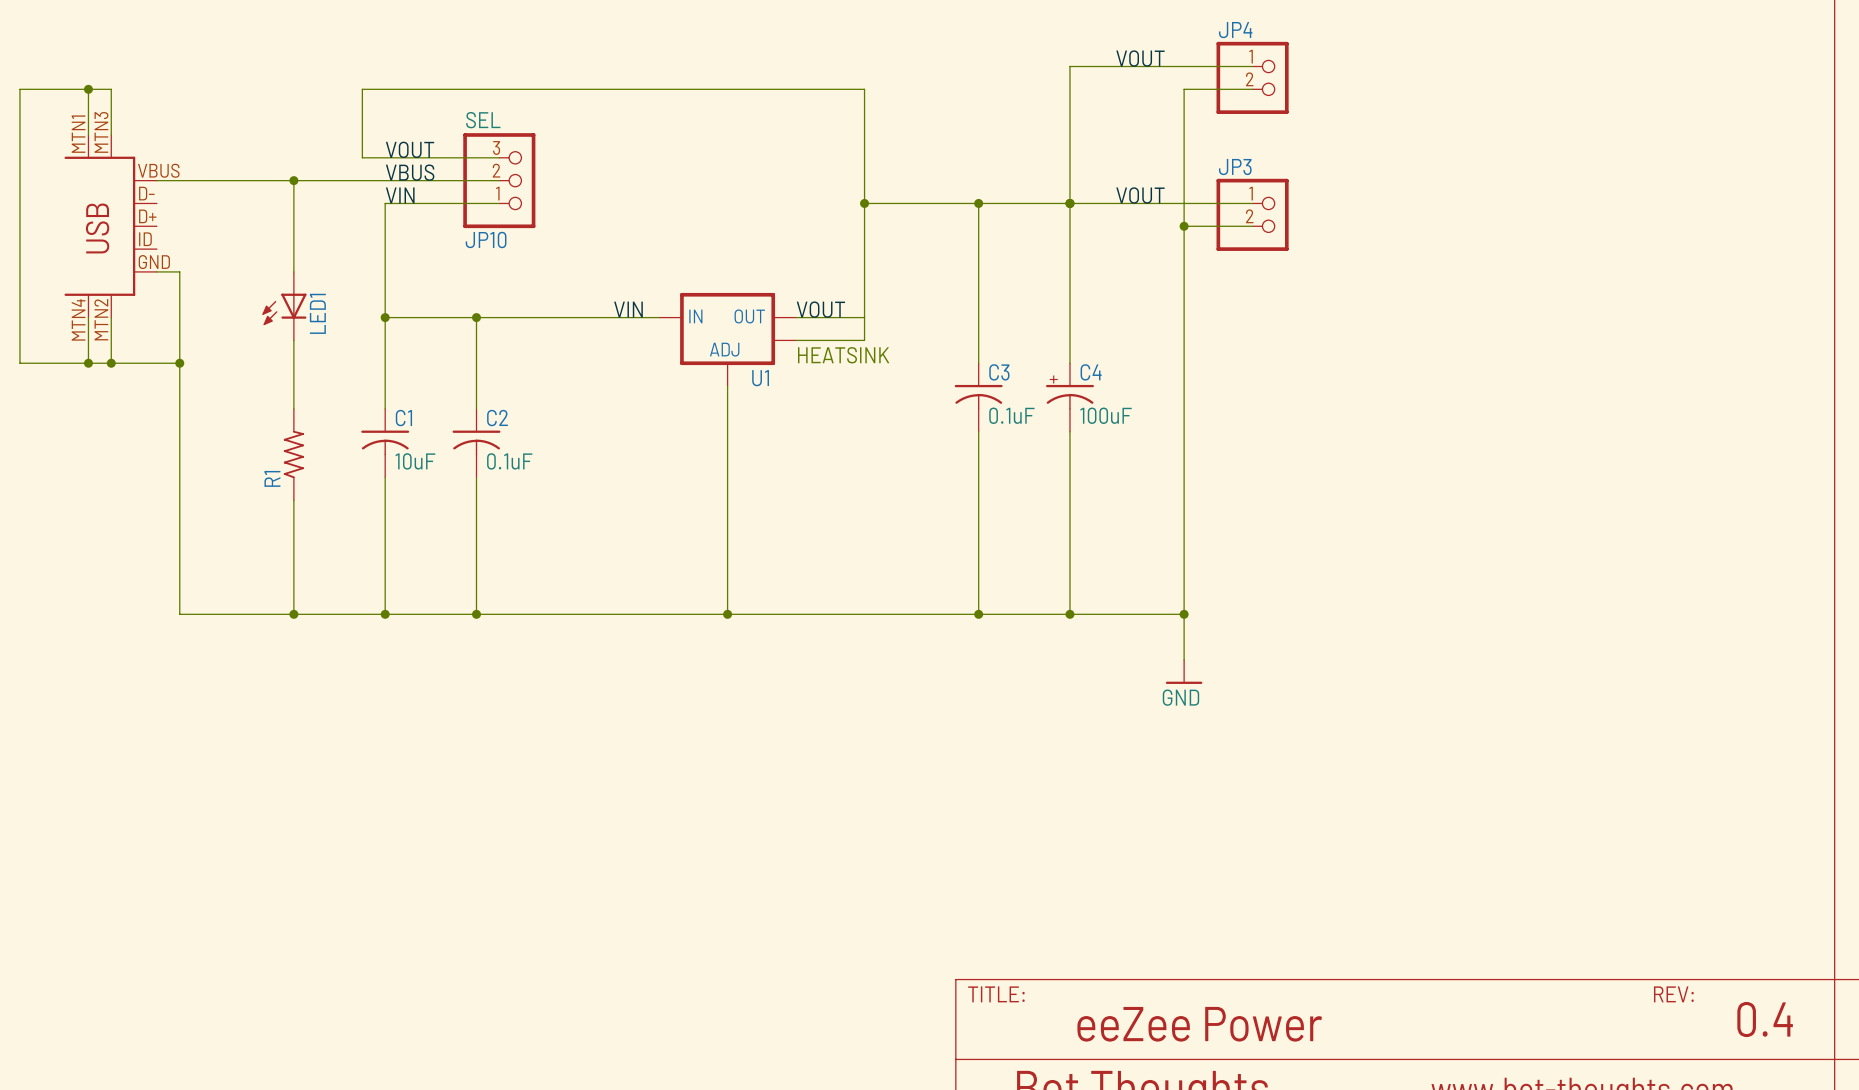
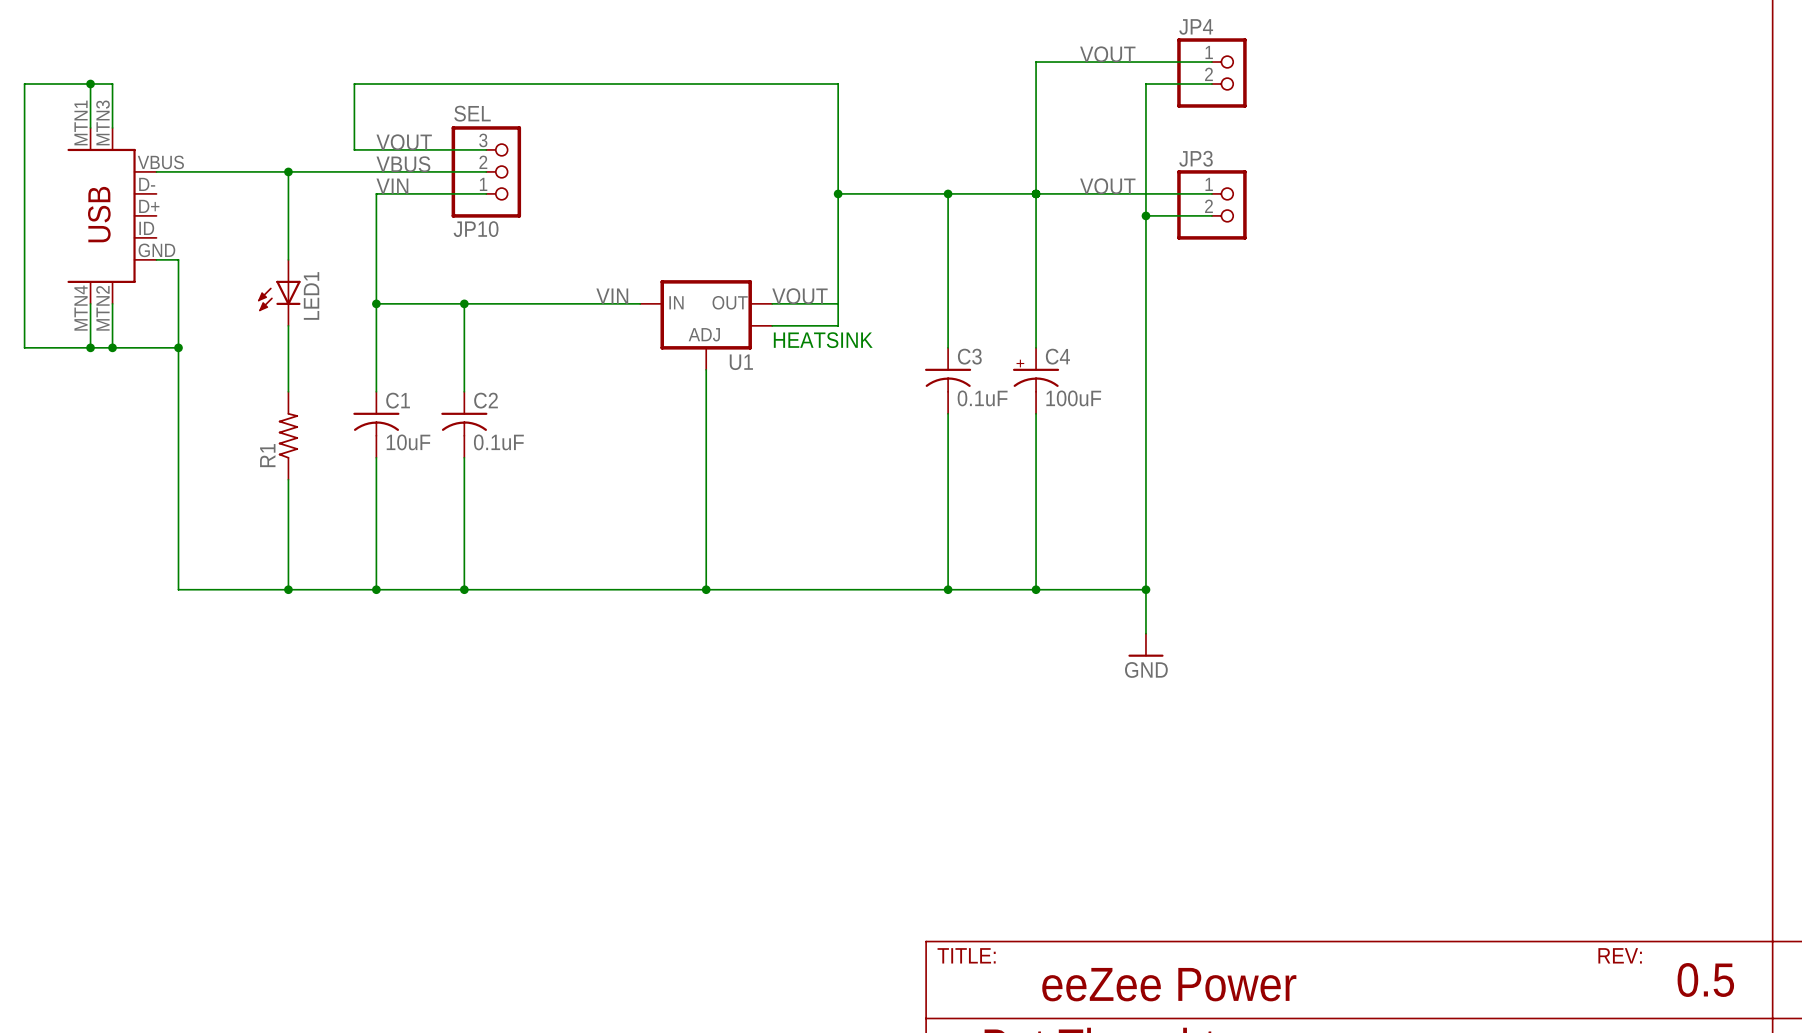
text: 0.4 (1765, 1019) -> 0.5 (1705, 980)

